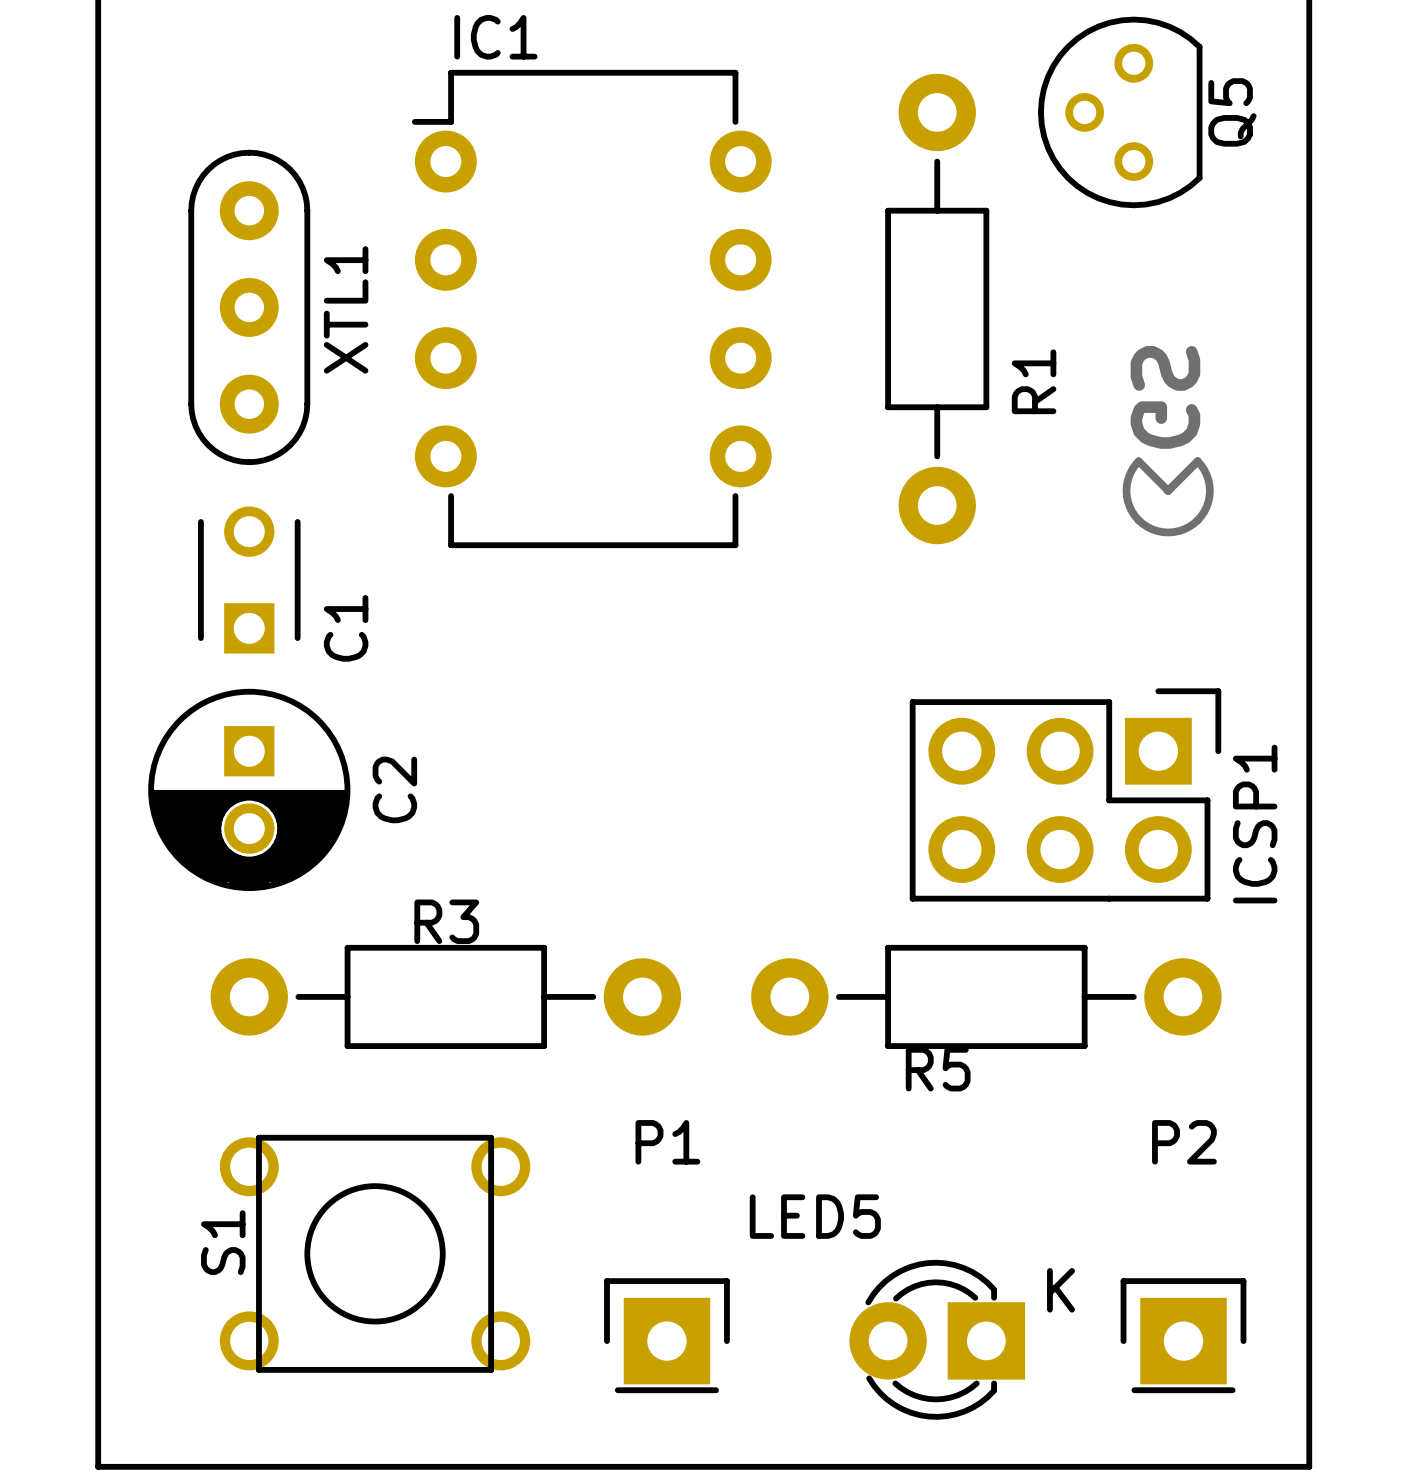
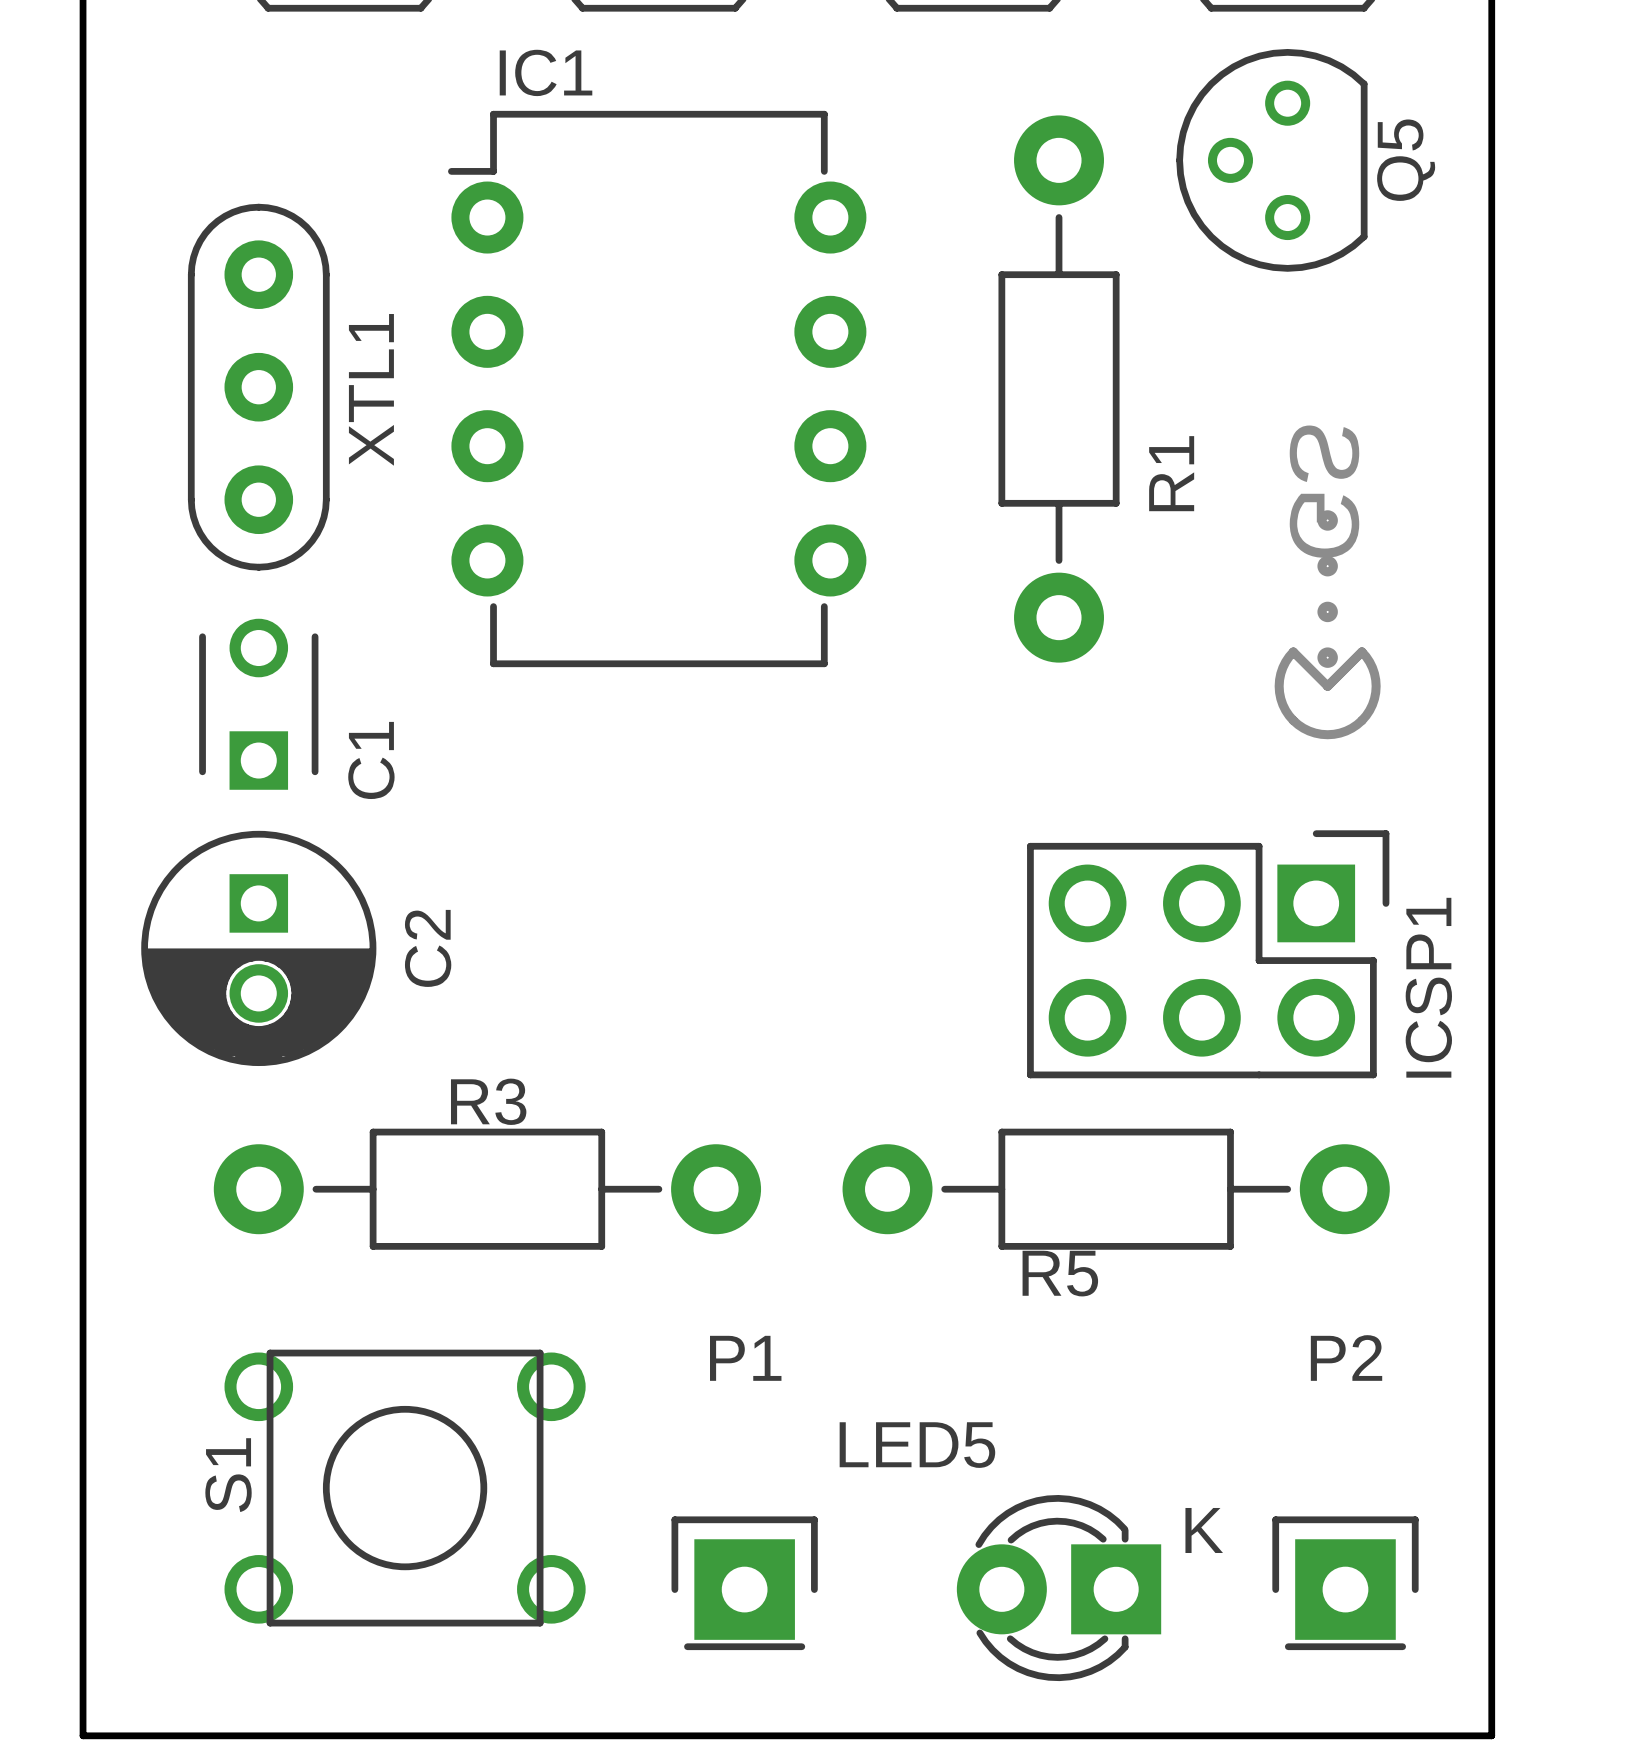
drawing: none -> [1317, 510, 1338, 668]
line: (1138, 461) (1168, 490) (1197, 461) (1206, 474) (1209, 490) (1206, 506) (1197, 520) (1184, 529) (1168, 532) (1152, 529) (1138, 520) (1129, 506) (1126, 490) (1129, 474) (1138, 461) -> (1293, 651) (1327, 686) (1361, 651) (1372, 667) (1376, 686) (1372, 704) (1361, 720) (1346, 731) (1327, 734) (1309, 731) (1293, 720) (1282, 704) (1279, 686) (1282, 667) (1293, 651)

